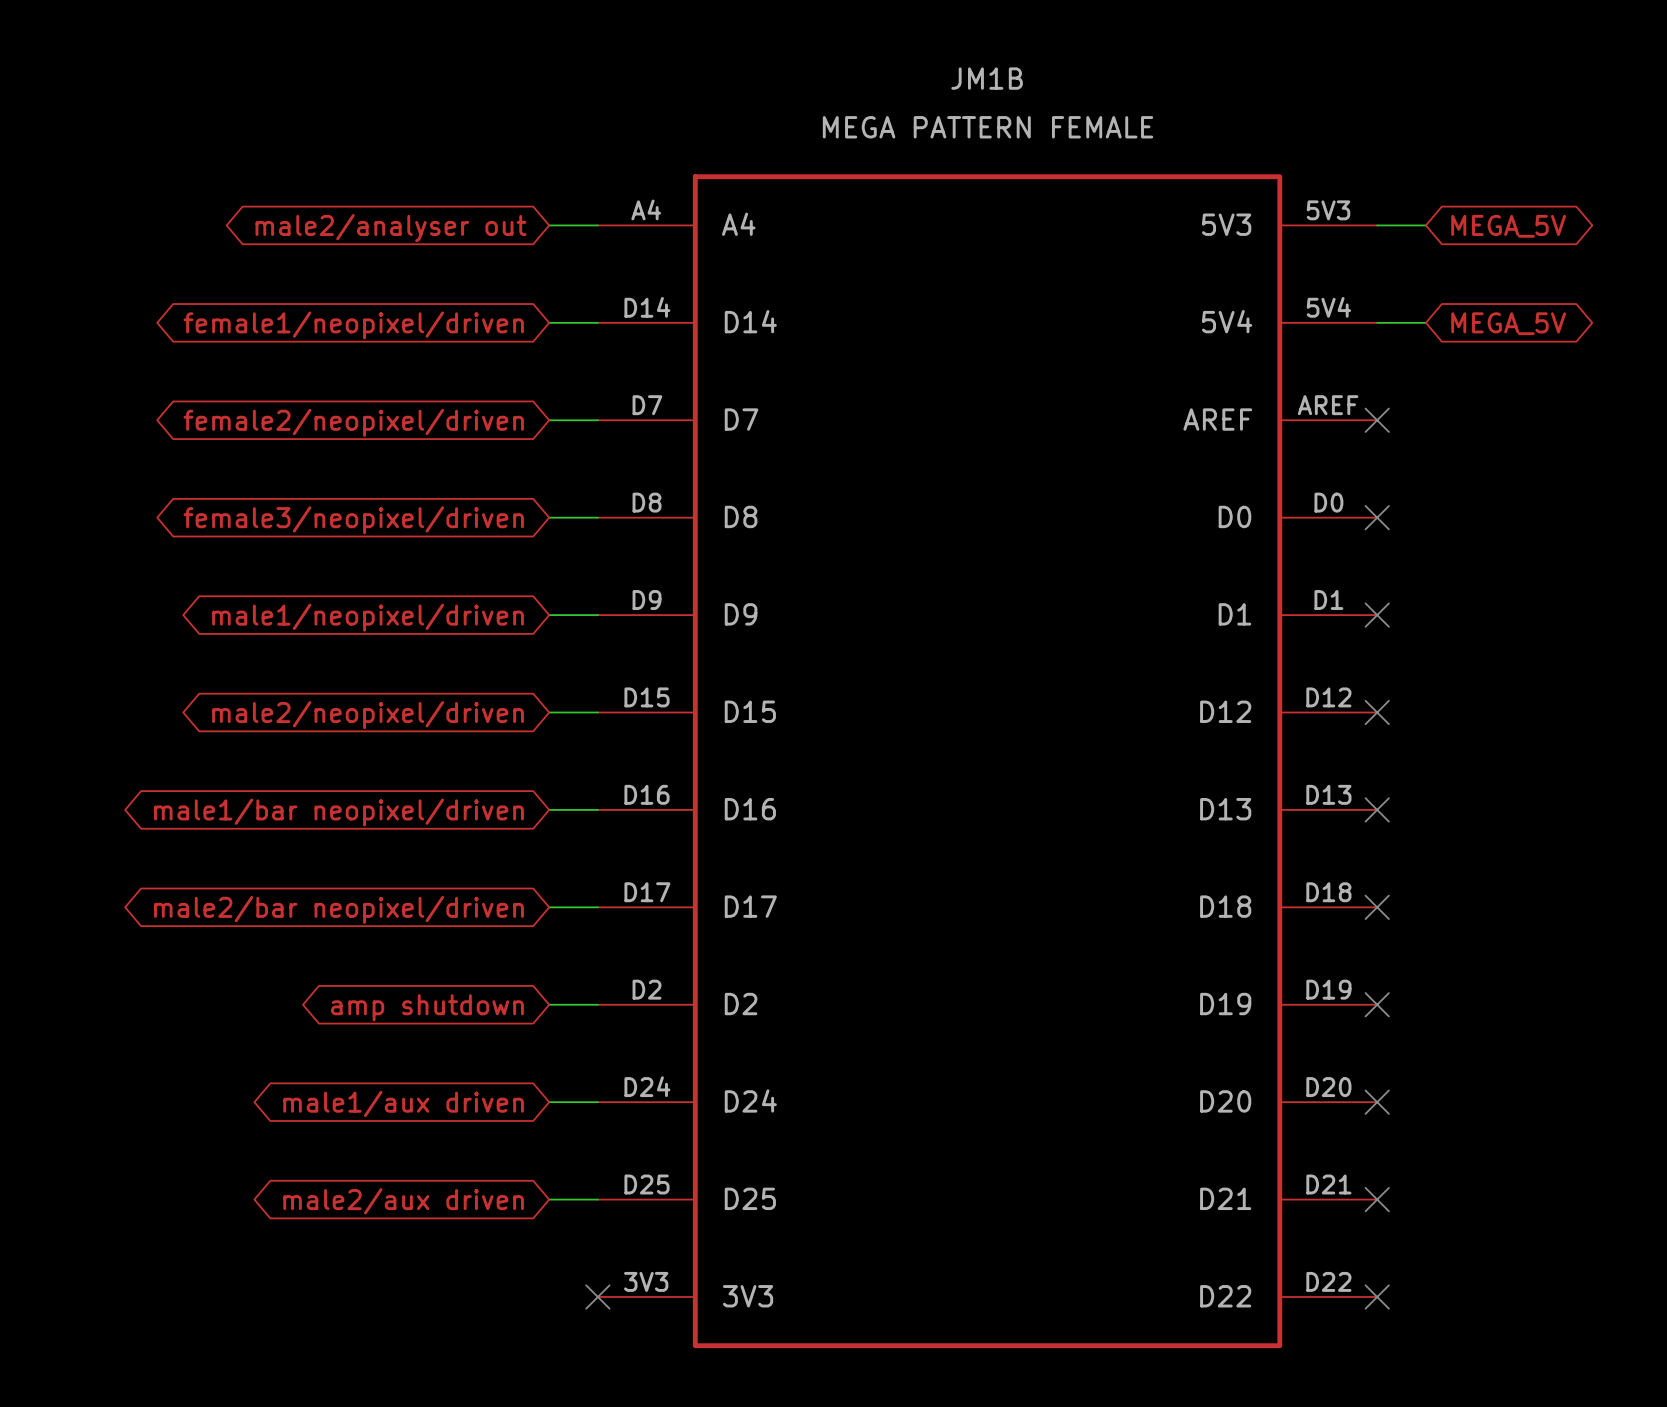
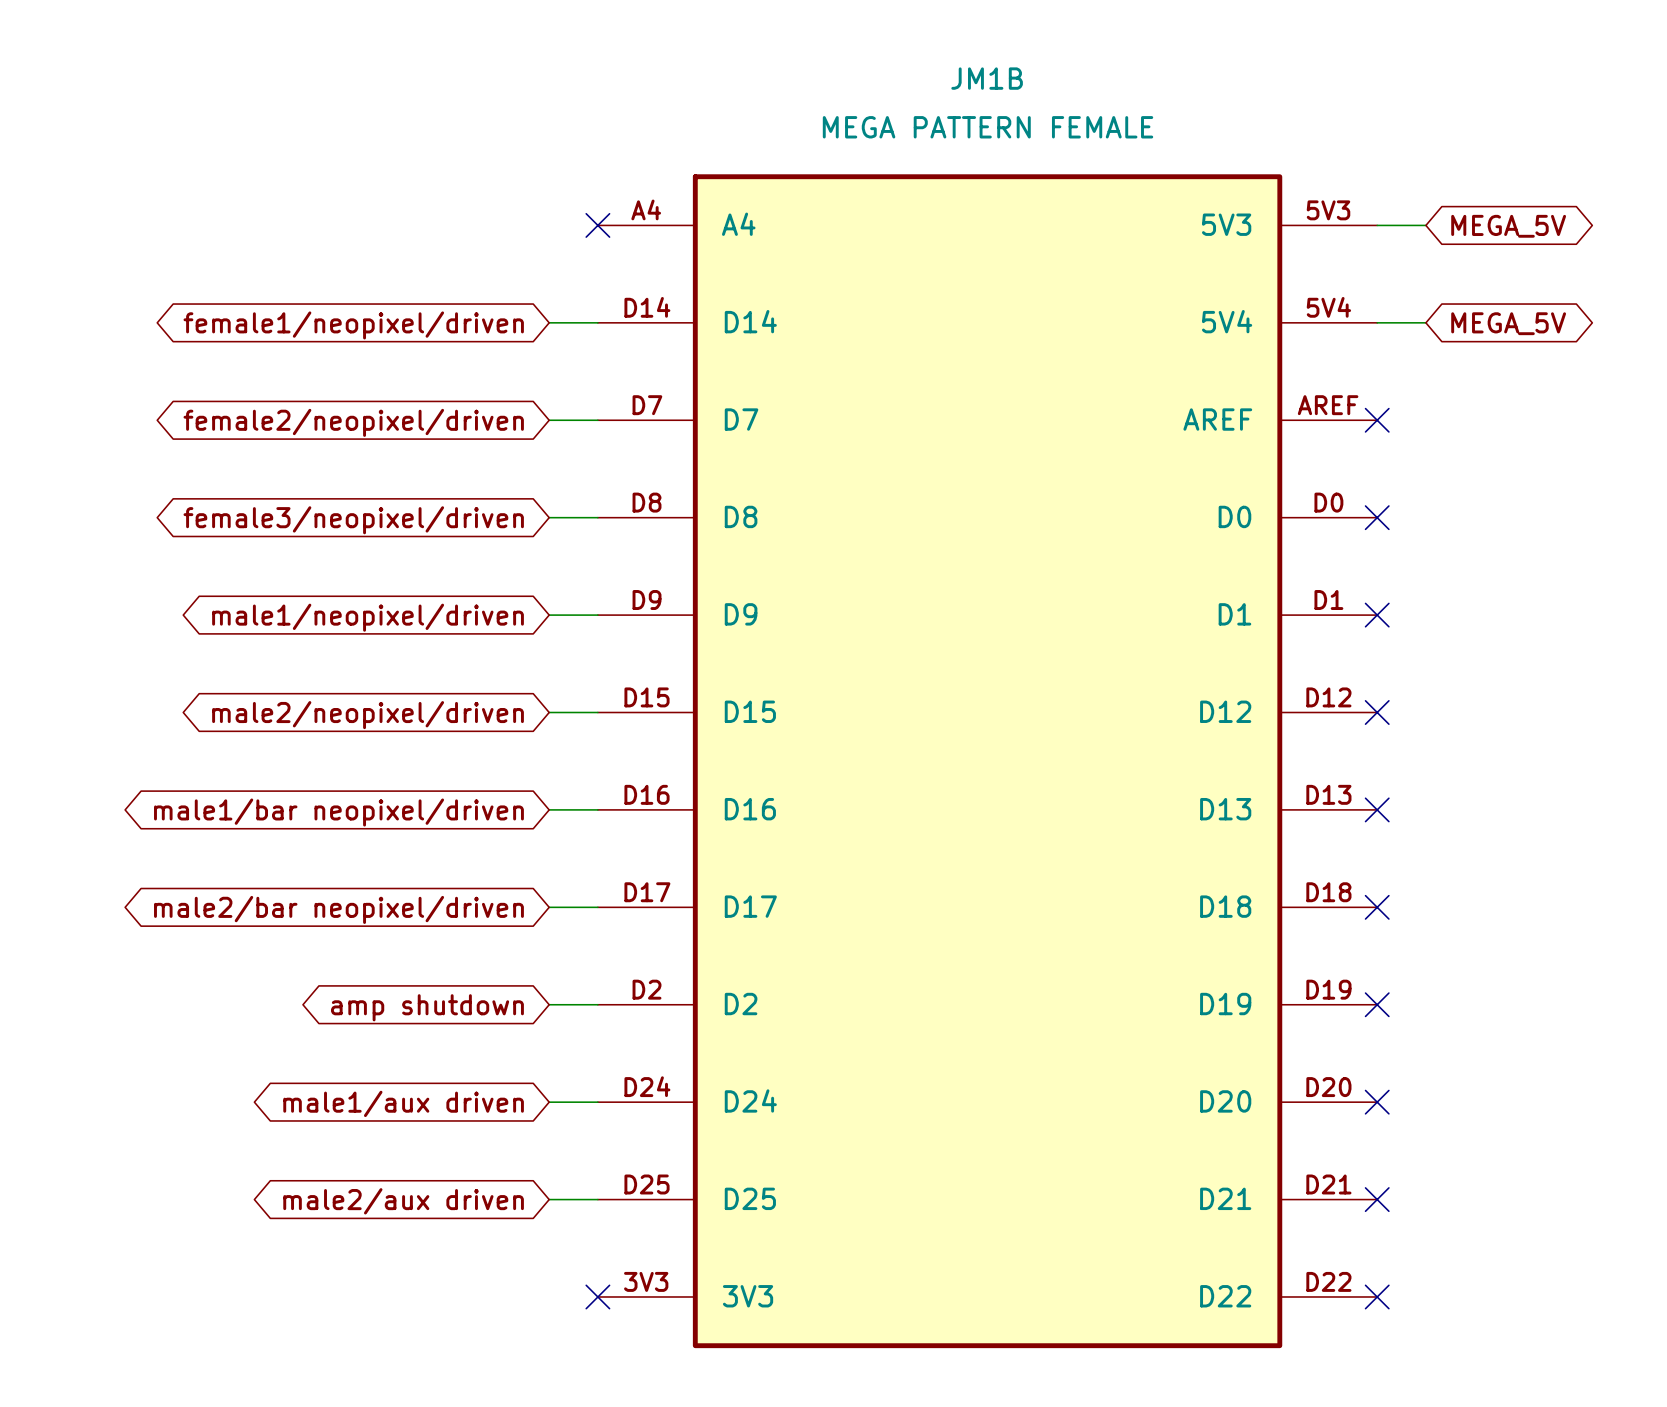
wire: (549, 225) (597, 225) -> none
no-connect mark: none -> (597, 225)
global label: male2/analyser out (391, 228) -> none

